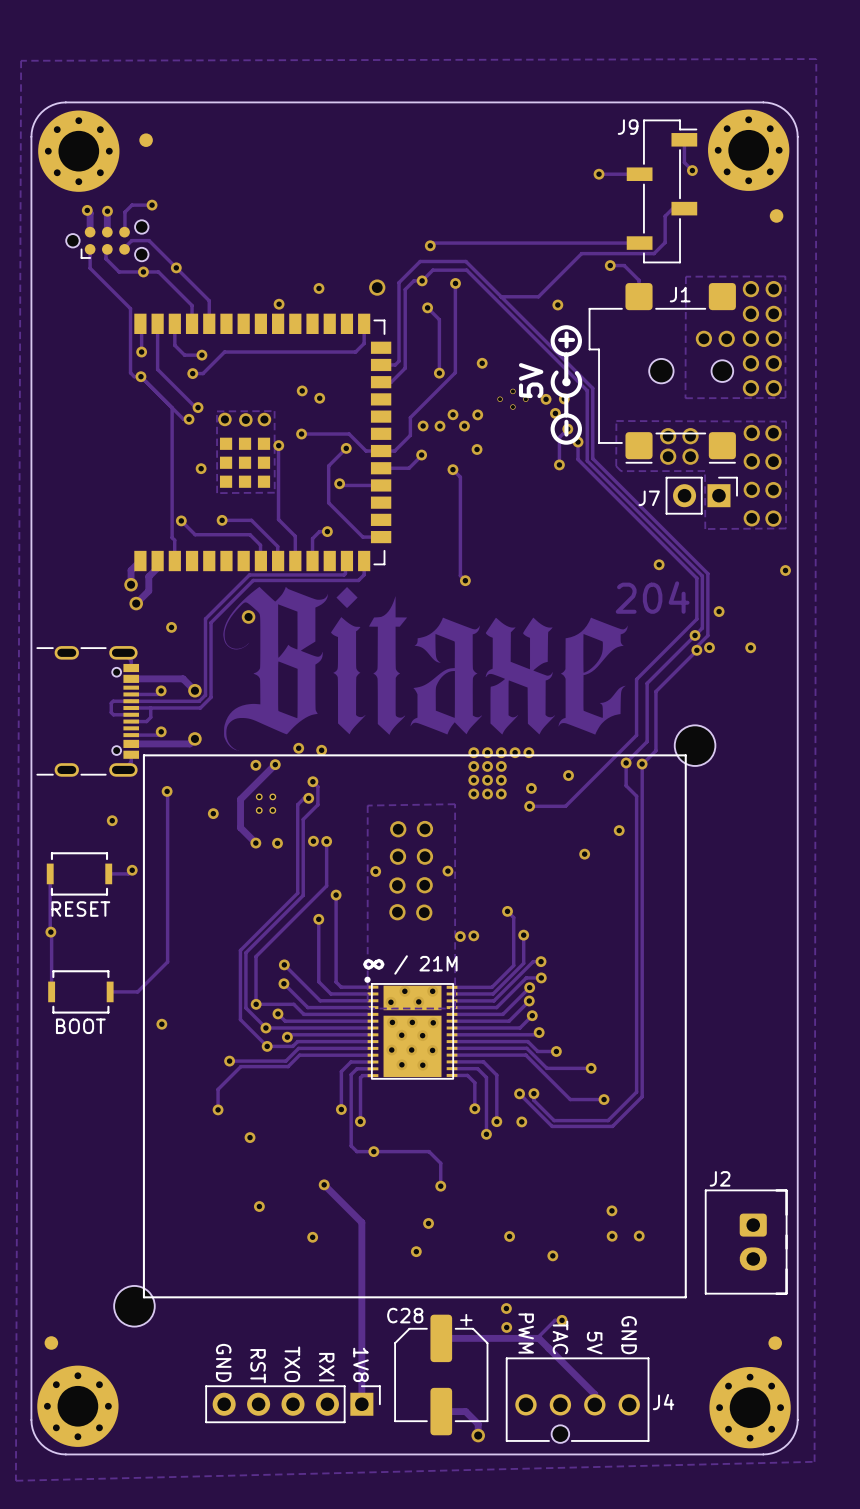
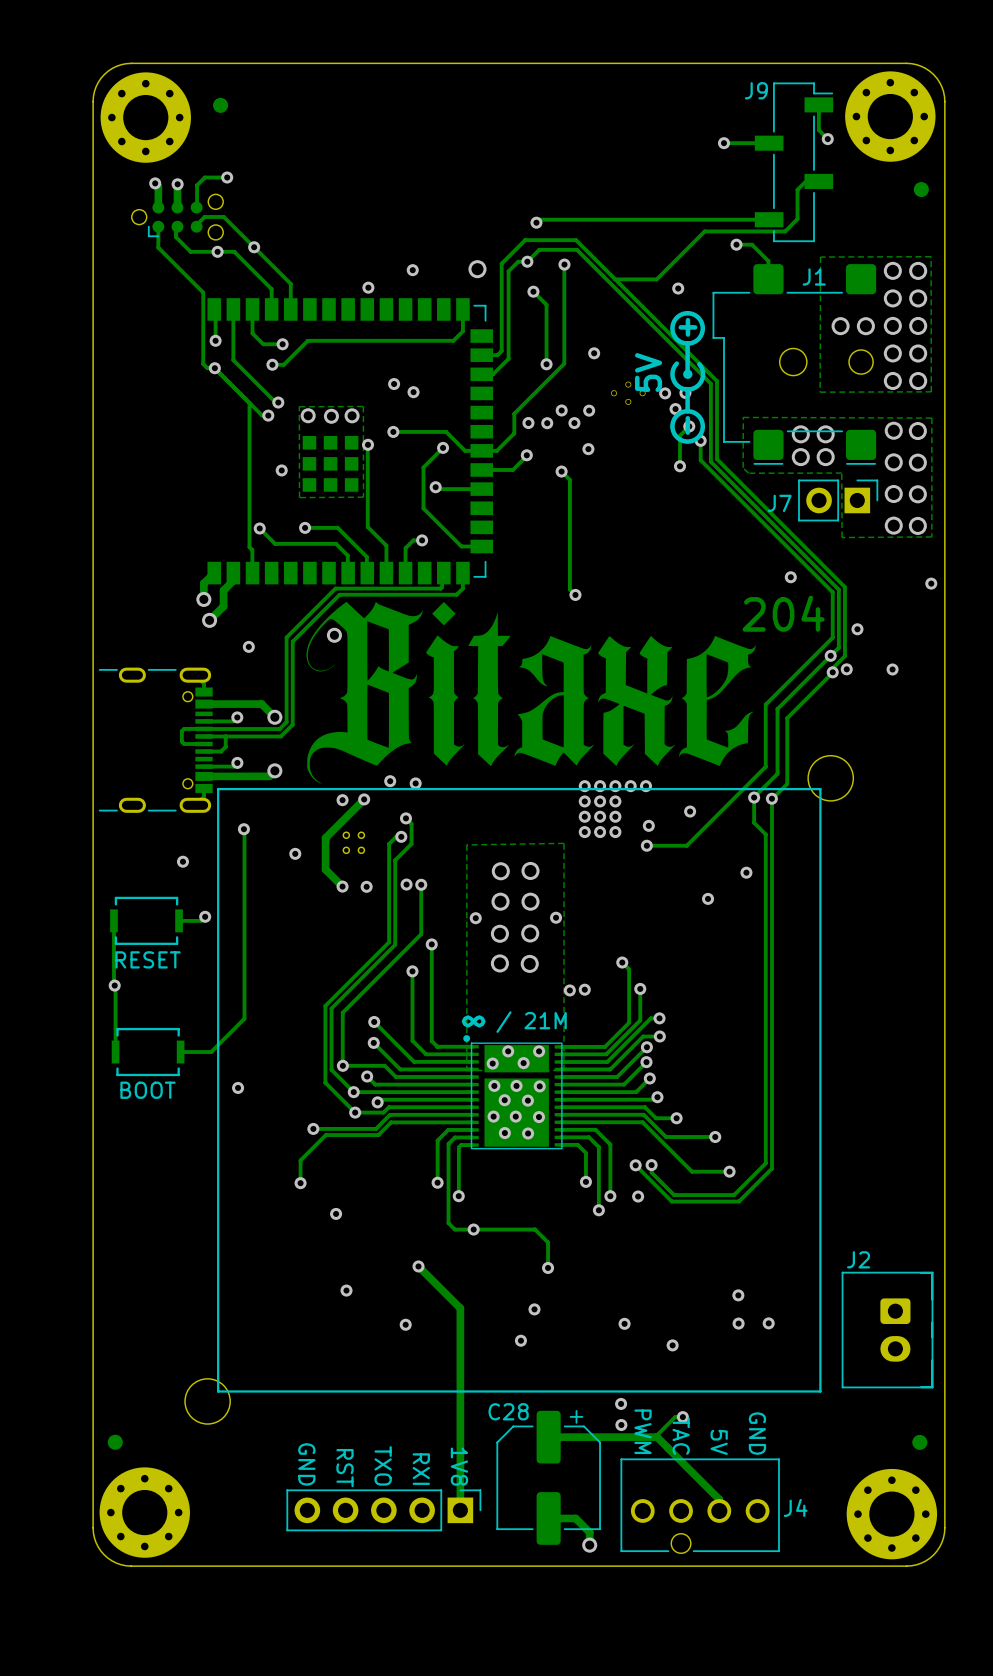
zone outline: (816, 59) (21, 60) (15, 1480) (814, 1461) (816, 59) -> none

